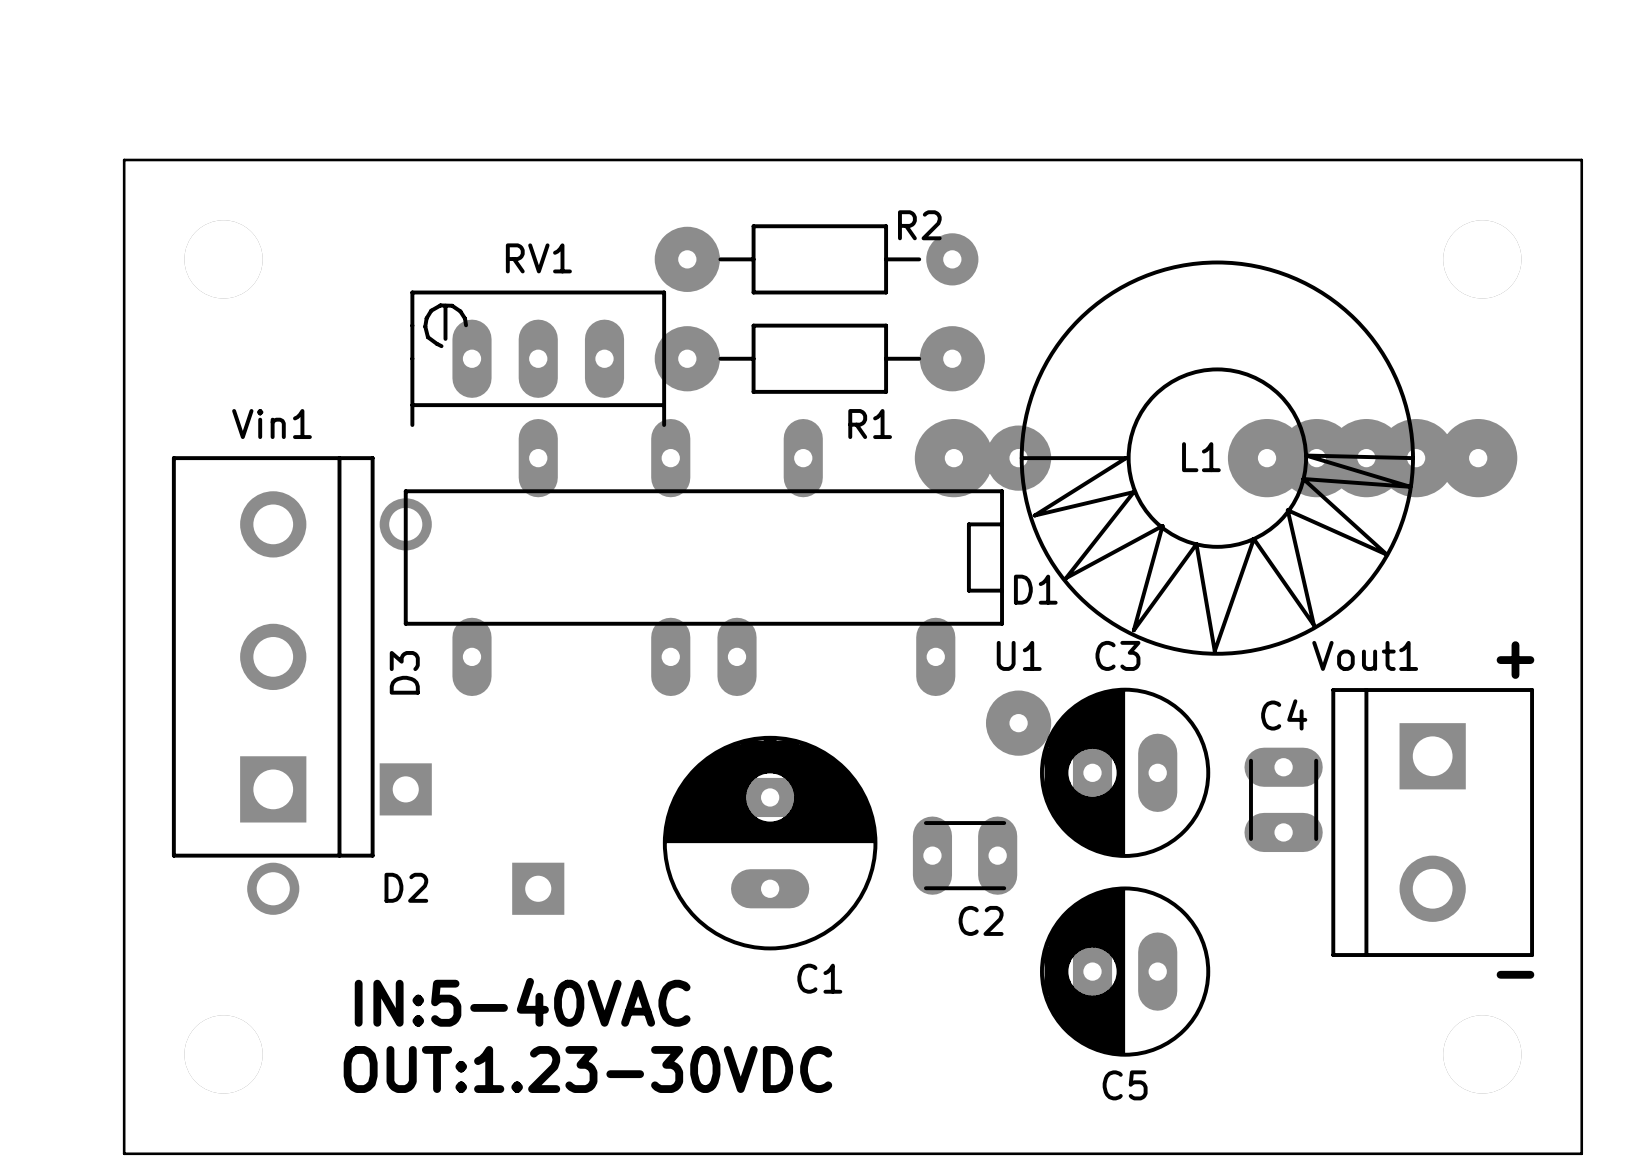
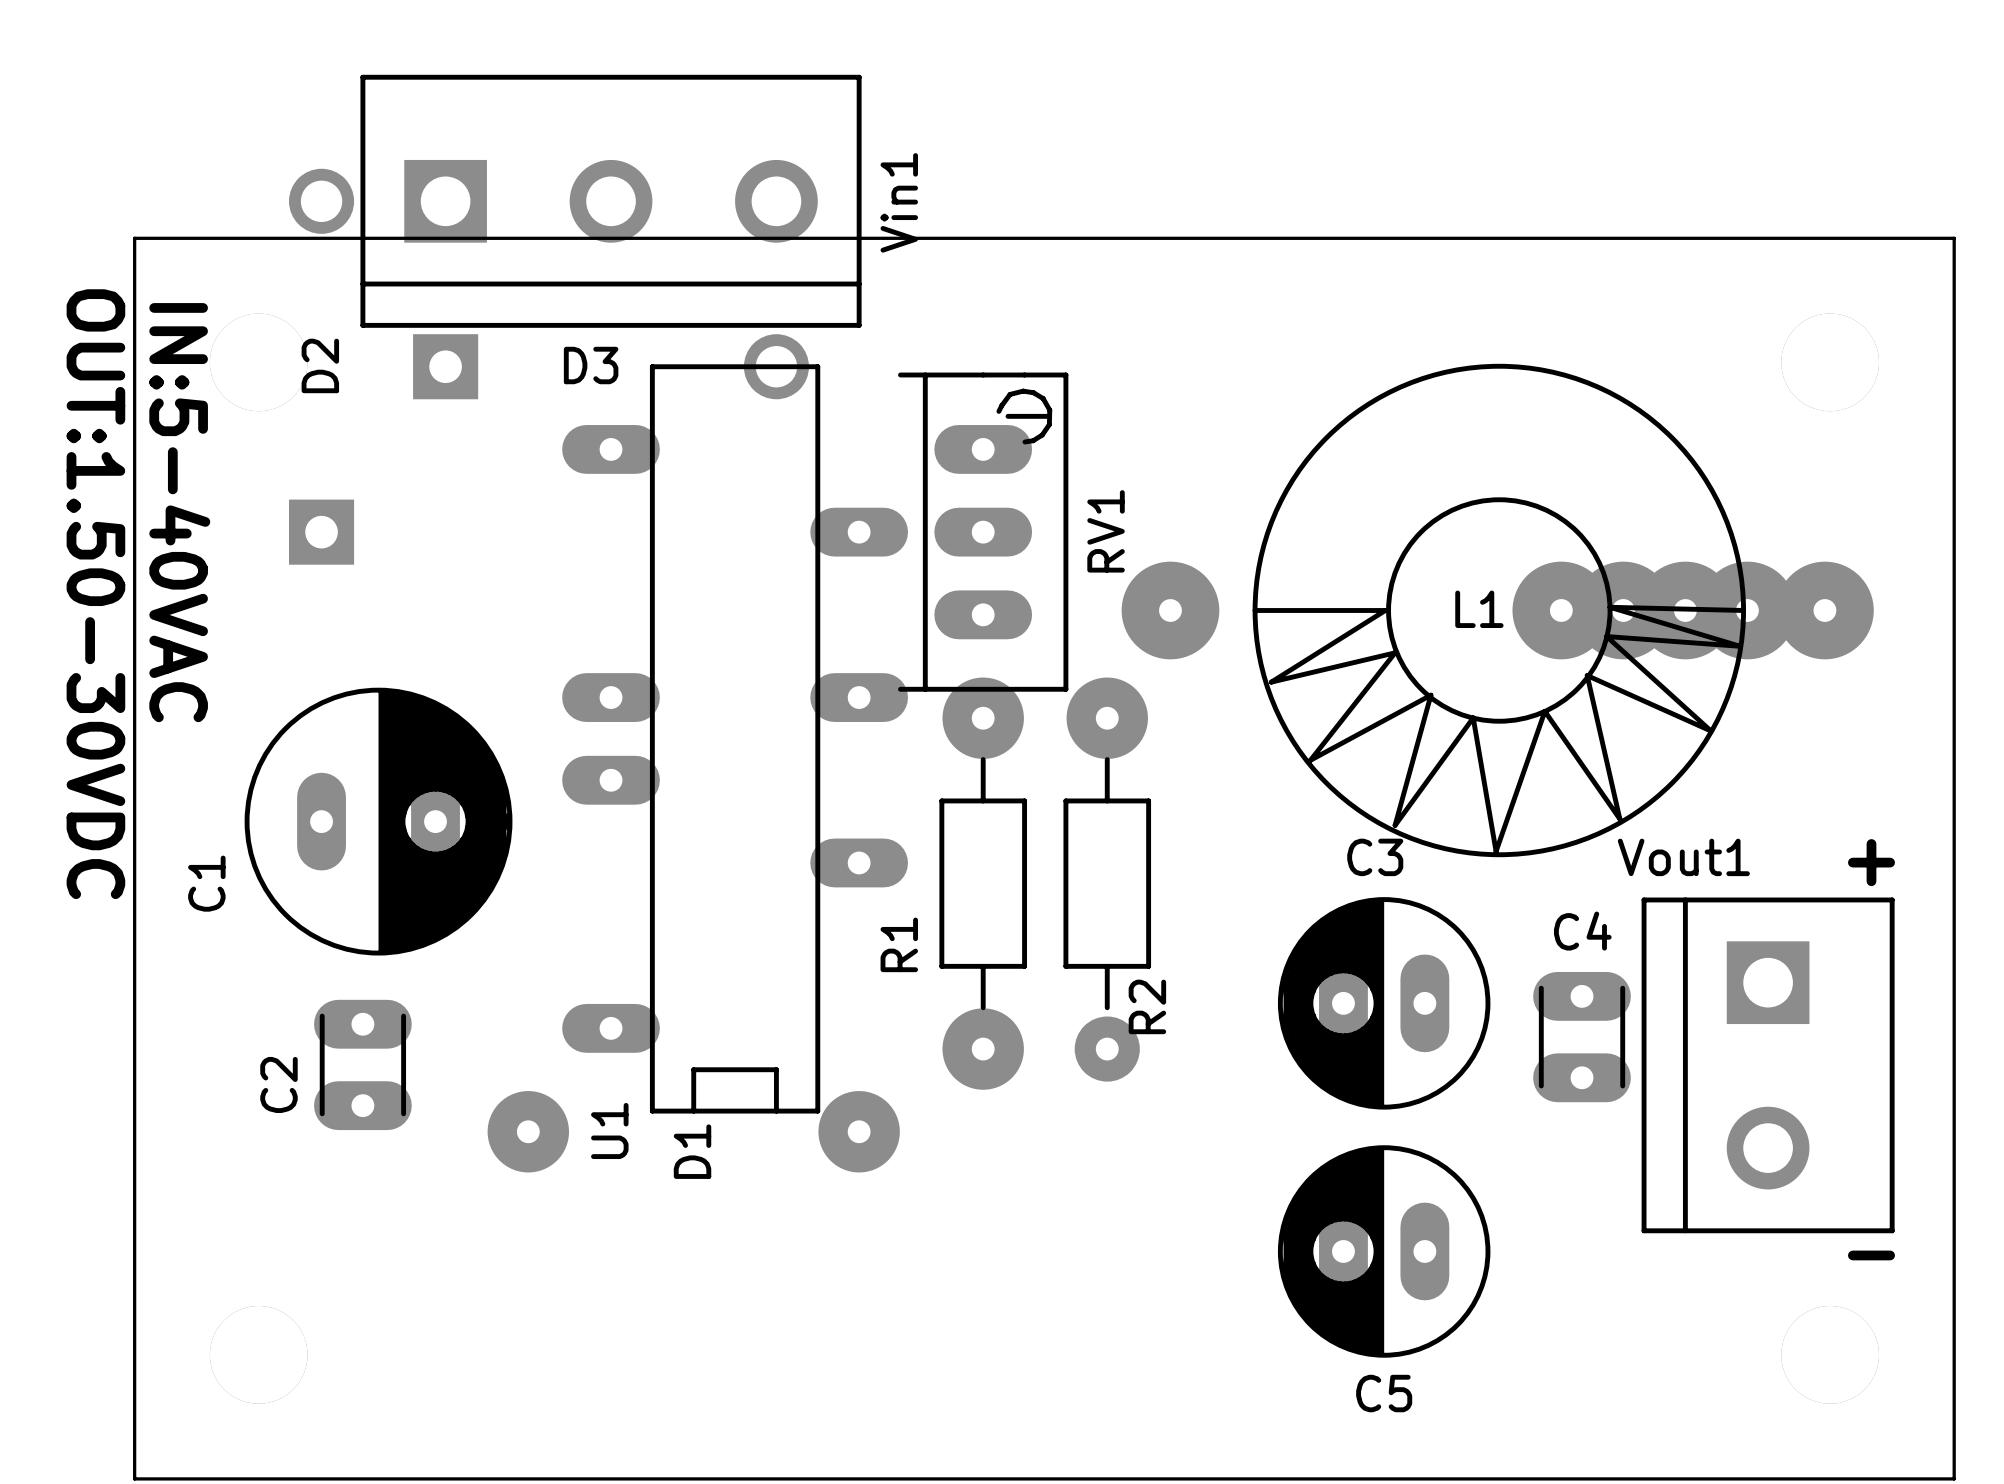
R2 rotation: 0° (816, 259) -> 90° clockwise (1107, 879)
R2 position: (816, 259) -> (1107, 879)
RV1 rotation: 0° (538, 358) -> 90° clockwise (983, 532)
RV1 position: (538, 358) -> (983, 532)
R1 rotation: 0° (819, 358) -> 90° clockwise (983, 883)
R1 position: (819, 358) -> (983, 883)
text: none -> IN:5-40VAC (179, 512)
text: none -> OUT:1.50-30VDC (95, 594)
U1 rotation: 0° (703, 557) -> 90° clockwise (735, 738)
D1 rotation: 0° (1018, 590) -> 90° clockwise (693, 1131)
D1 position: (1018, 590) -> (693, 1131)
Vin1 rotation: 0° (273, 656) -> 90° clockwise (611, 201)
Vin1 position: (273, 656) -> (611, 201)
D3 rotation: 0° (405, 656) -> 90° clockwise (611, 366)
D3 position: (405, 656) -> (611, 366)
C1 rotation: 0° (770, 843) -> 90° clockwise (378, 821)
C1 position: (770, 843) -> (378, 821)
C2 rotation: 0° (965, 855) -> 90° clockwise (362, 1064)
C2 position: (965, 855) -> (362, 1064)
D2 rotation: 0° (405, 888) -> 90° clockwise (321, 366)
D2 position: (405, 888) -> (321, 366)
text: IN:5-40VAC (522, 1002) -> none
text: OUT:1.23-30VDC (587, 1069) -> none

